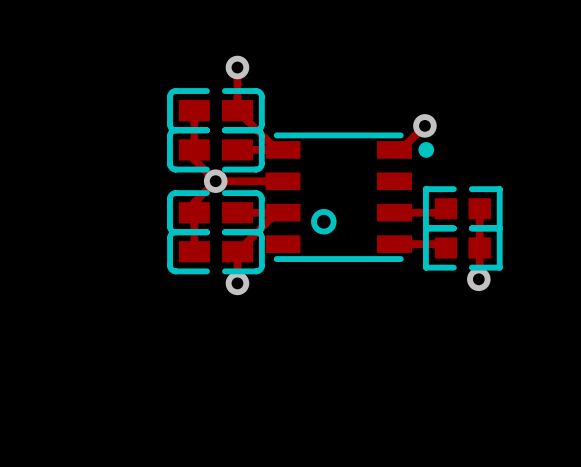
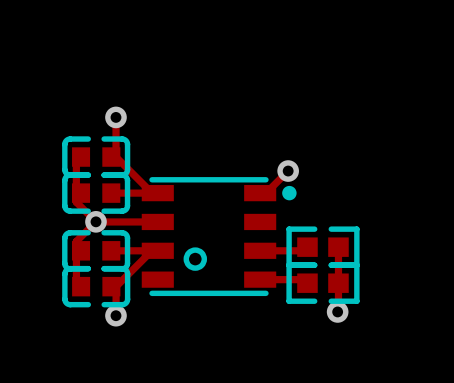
part footprint: [167, 88, 265, 134] -> [62, 136, 131, 178]
part footprint: [167, 127, 265, 173] -> [62, 172, 131, 214]
part footprint: [167, 190, 265, 236] -> [62, 230, 131, 272]
part footprint: [167, 229, 265, 275] -> [62, 265, 131, 308]

